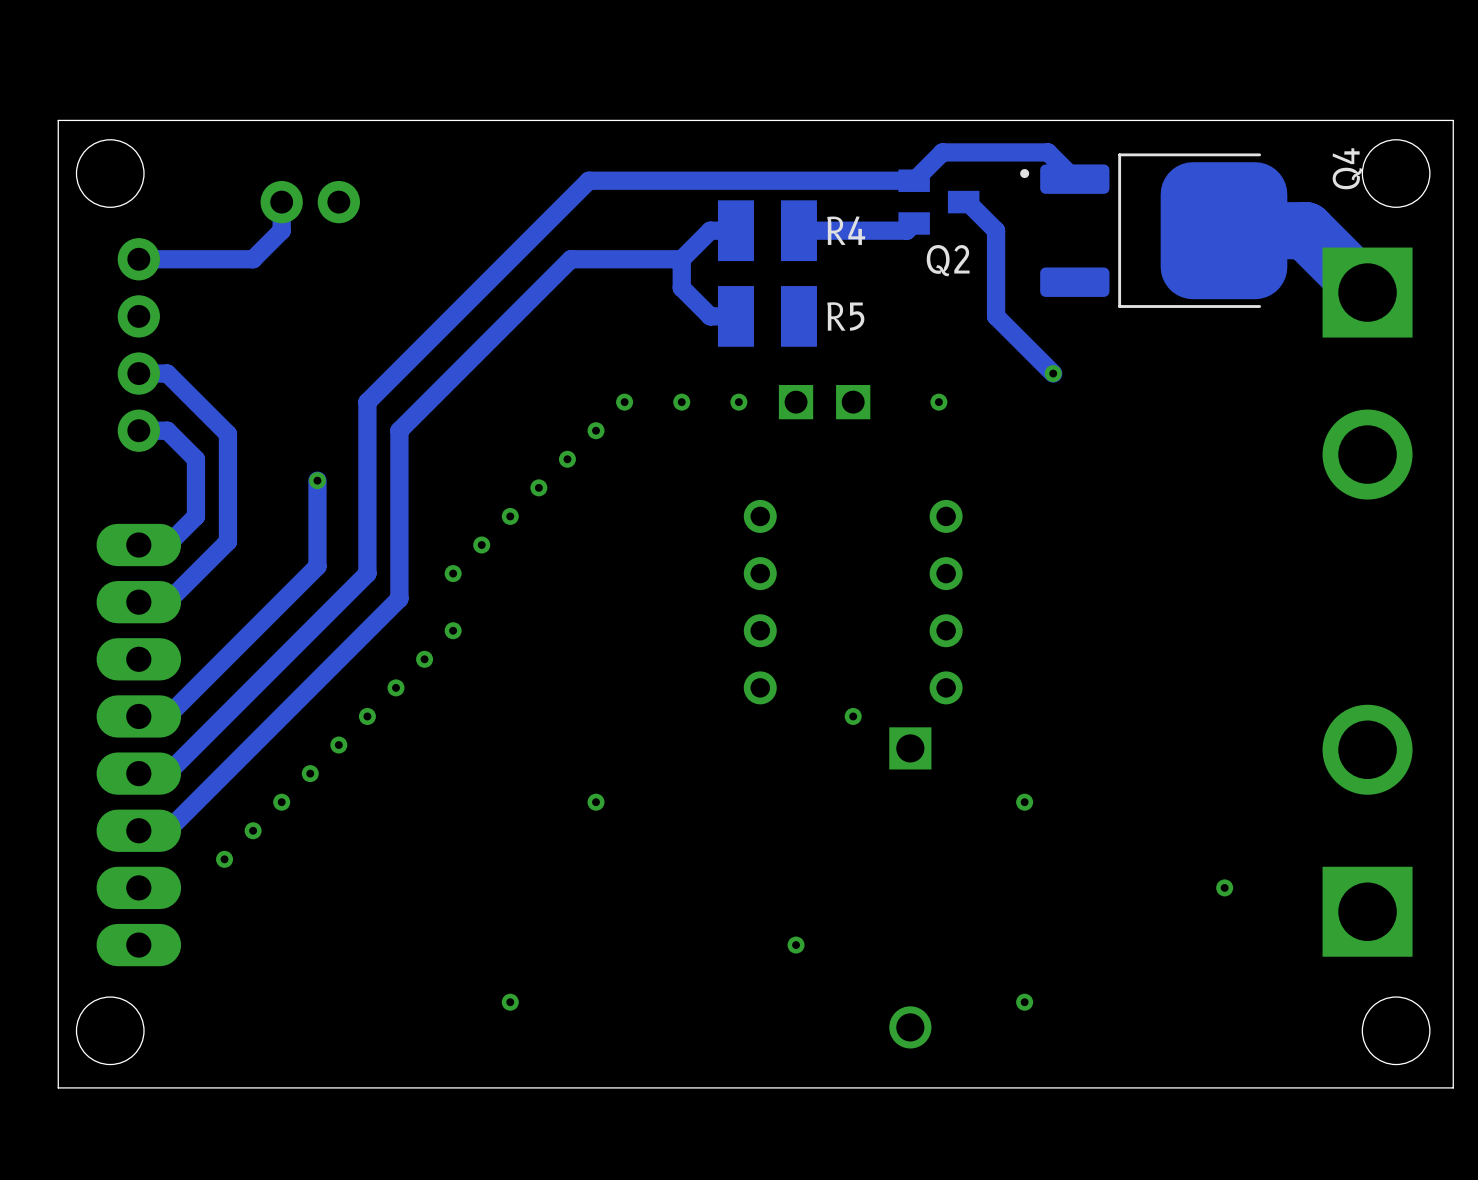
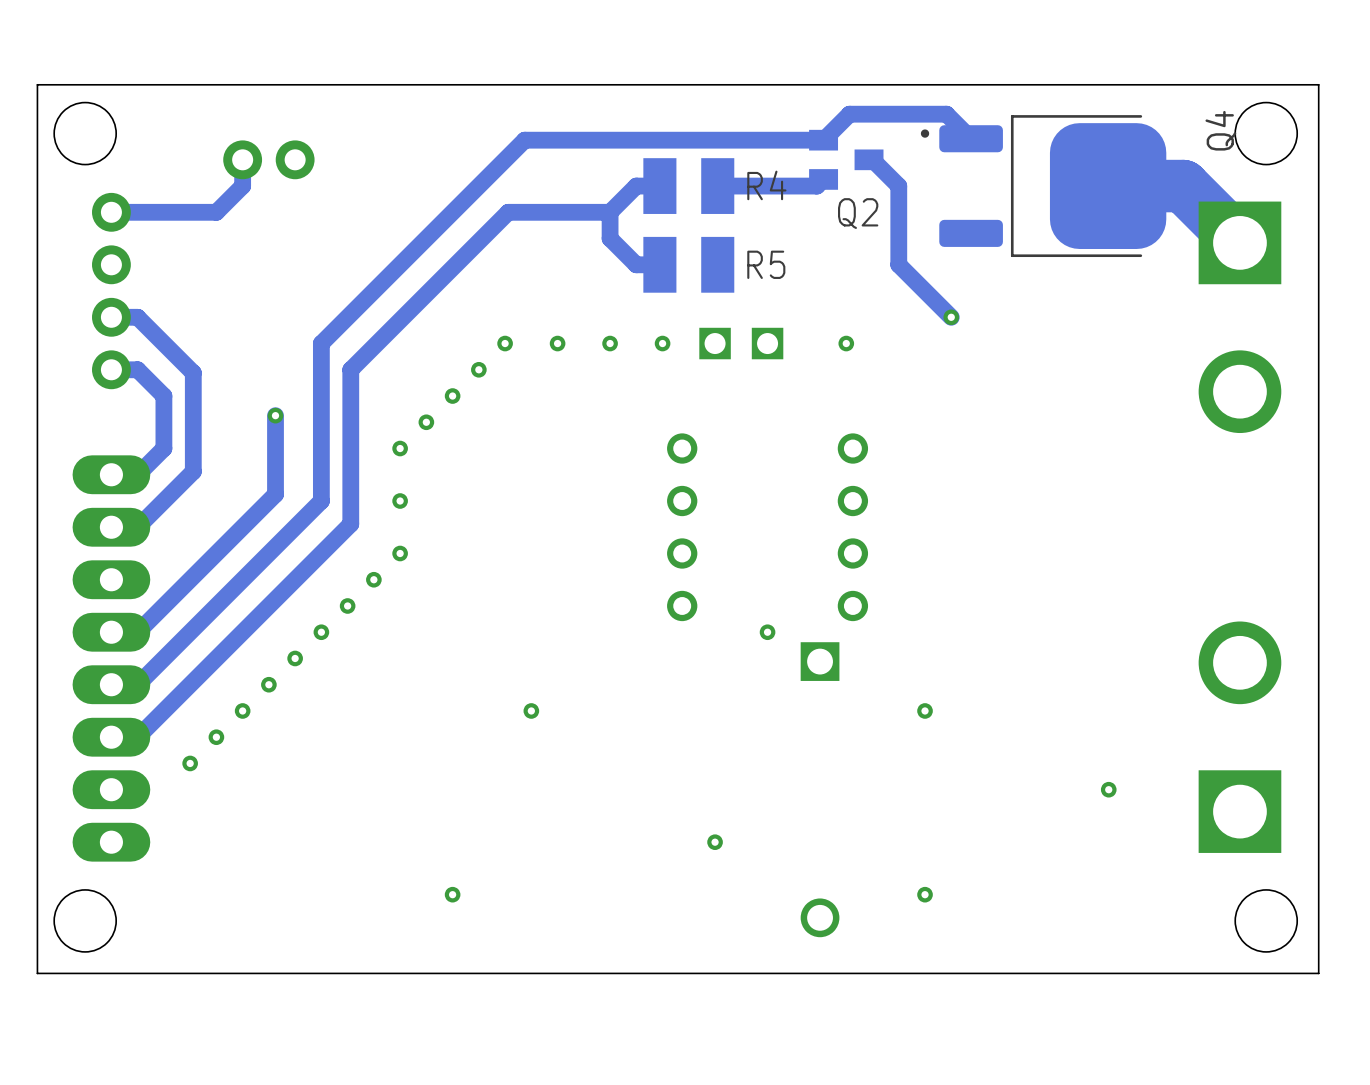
via: none -> (505, 343)
via: none -> (478, 369)
via: (596, 430) -> none
via: none -> (452, 396)
via: (567, 459) -> none
via: none -> (426, 422)
via: (538, 487) -> none
via: none -> (400, 448)
via: (510, 516) -> none
via: (481, 545) -> none

